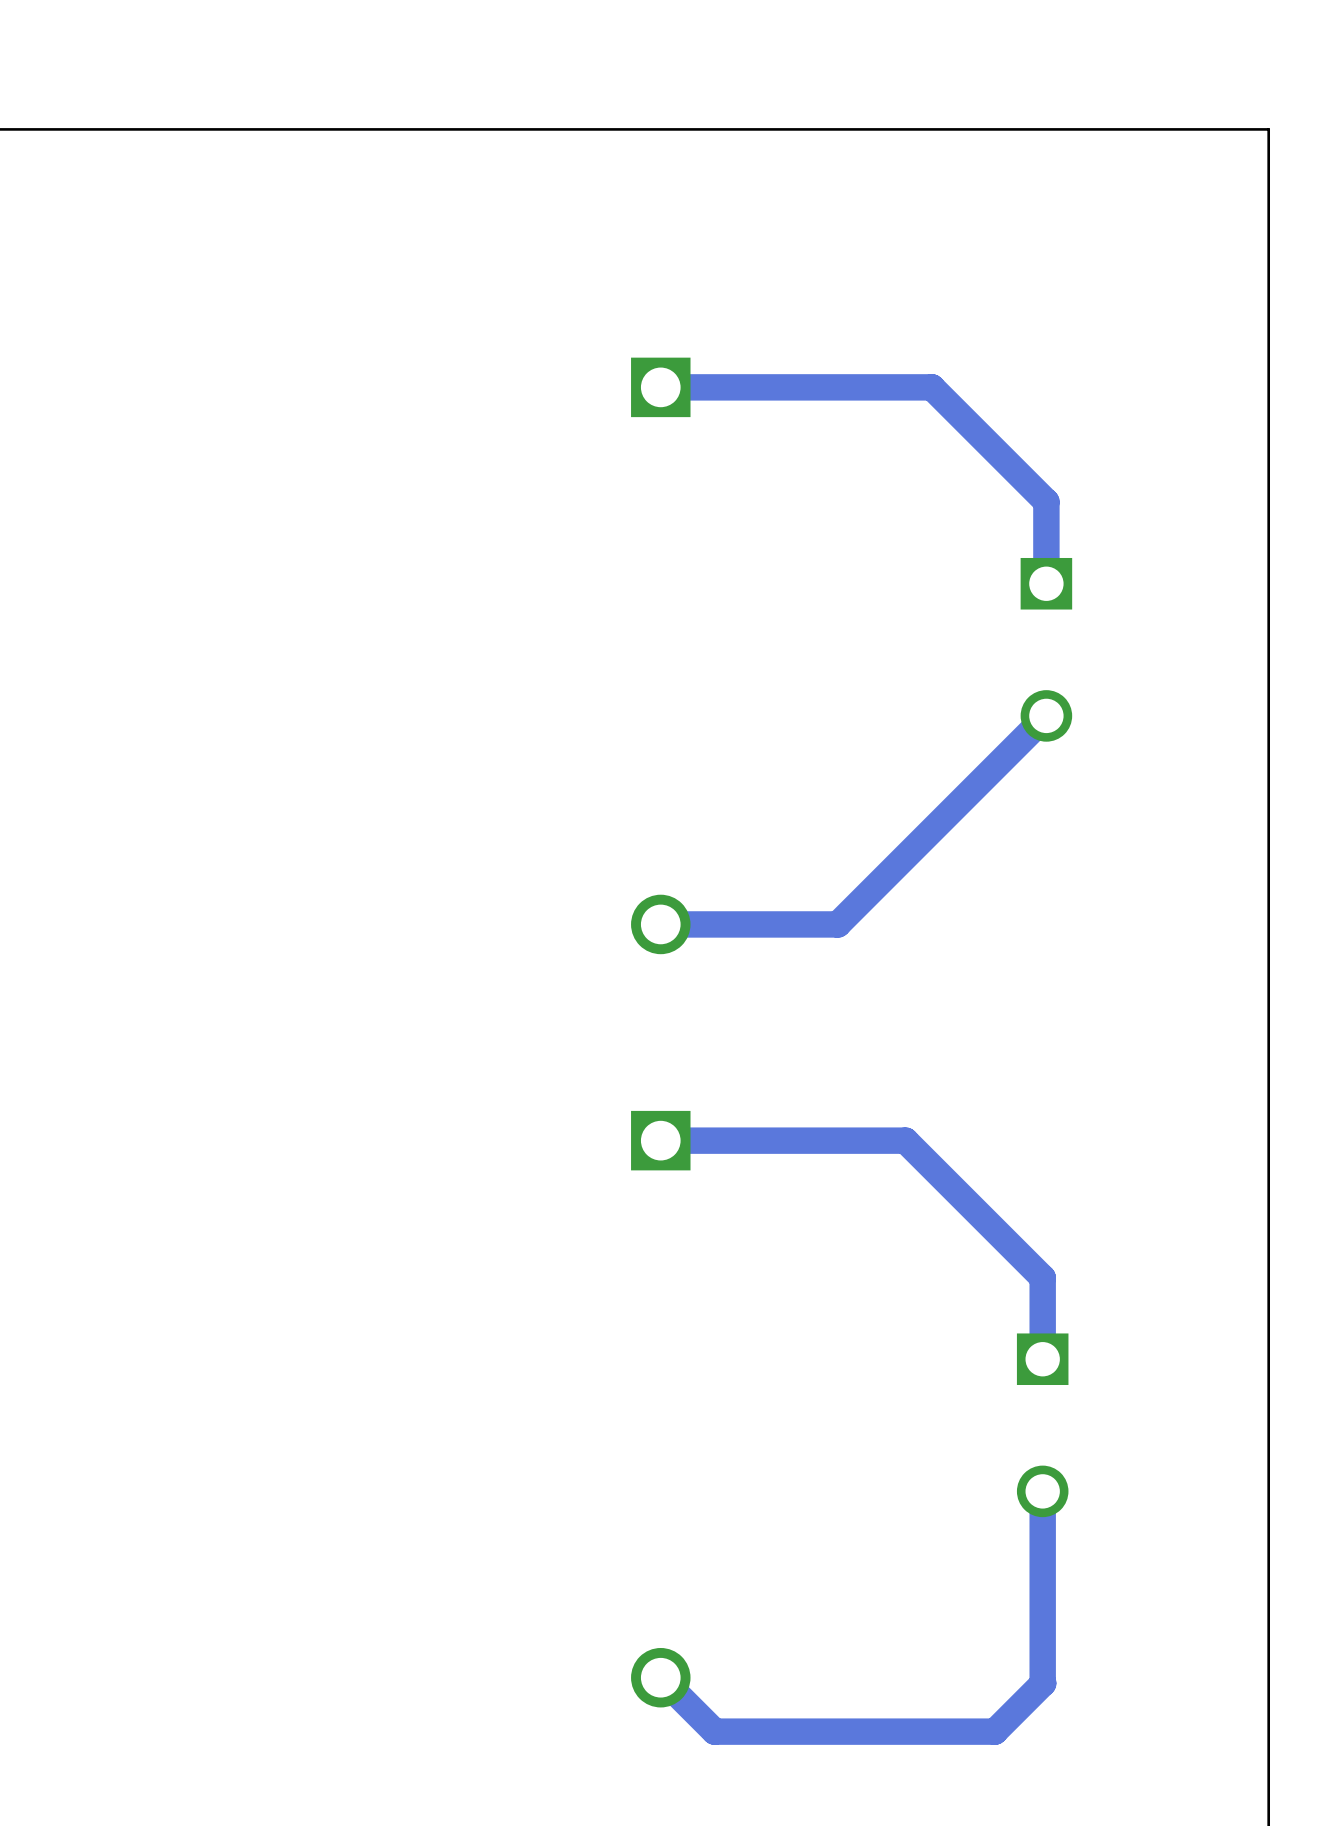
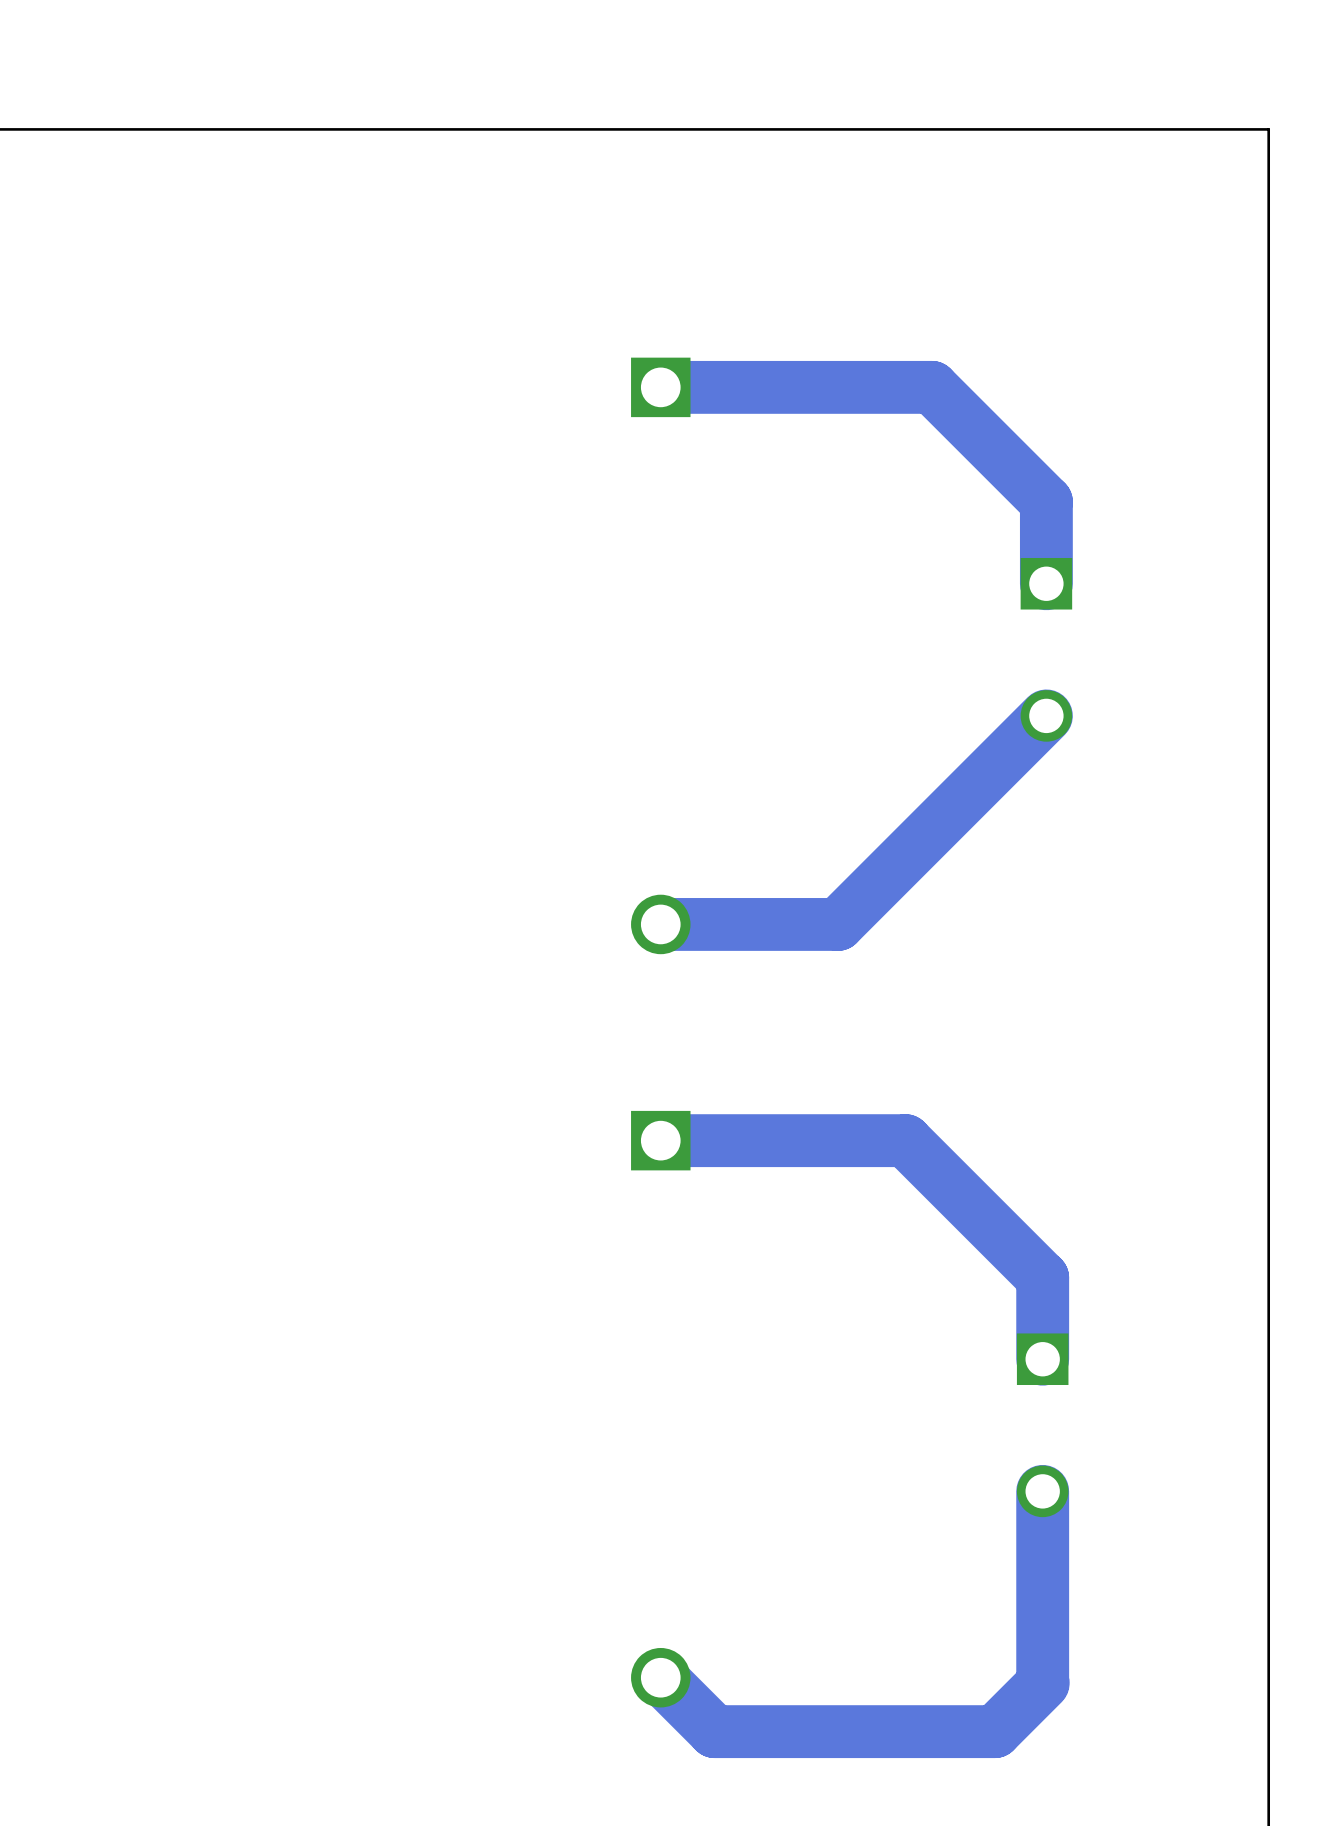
bottom track width: thin (660, 387) (931, 387) (1046, 501) (1046, 583) -> thick (660, 387) (931, 387) (1046, 501) (1046, 583)
bottom track width: thin (1046, 715) (837, 924) (660, 924) -> thick (1046, 715) (837, 924) (660, 924)
bottom track width: thin (660, 1140) (905, 1140) (1042, 1277) (1042, 1359) -> thick (660, 1140) (905, 1140) (1042, 1277) (1042, 1359)
bottom track width: thin (1042, 1491) (1042, 1682) -> thick (1042, 1491) (1042, 1682)
bottom track width: thin (660, 1677) (714, 1731) (994, 1731) (1043, 1683) -> thick (660, 1677) (714, 1731) (994, 1731) (1043, 1683)

